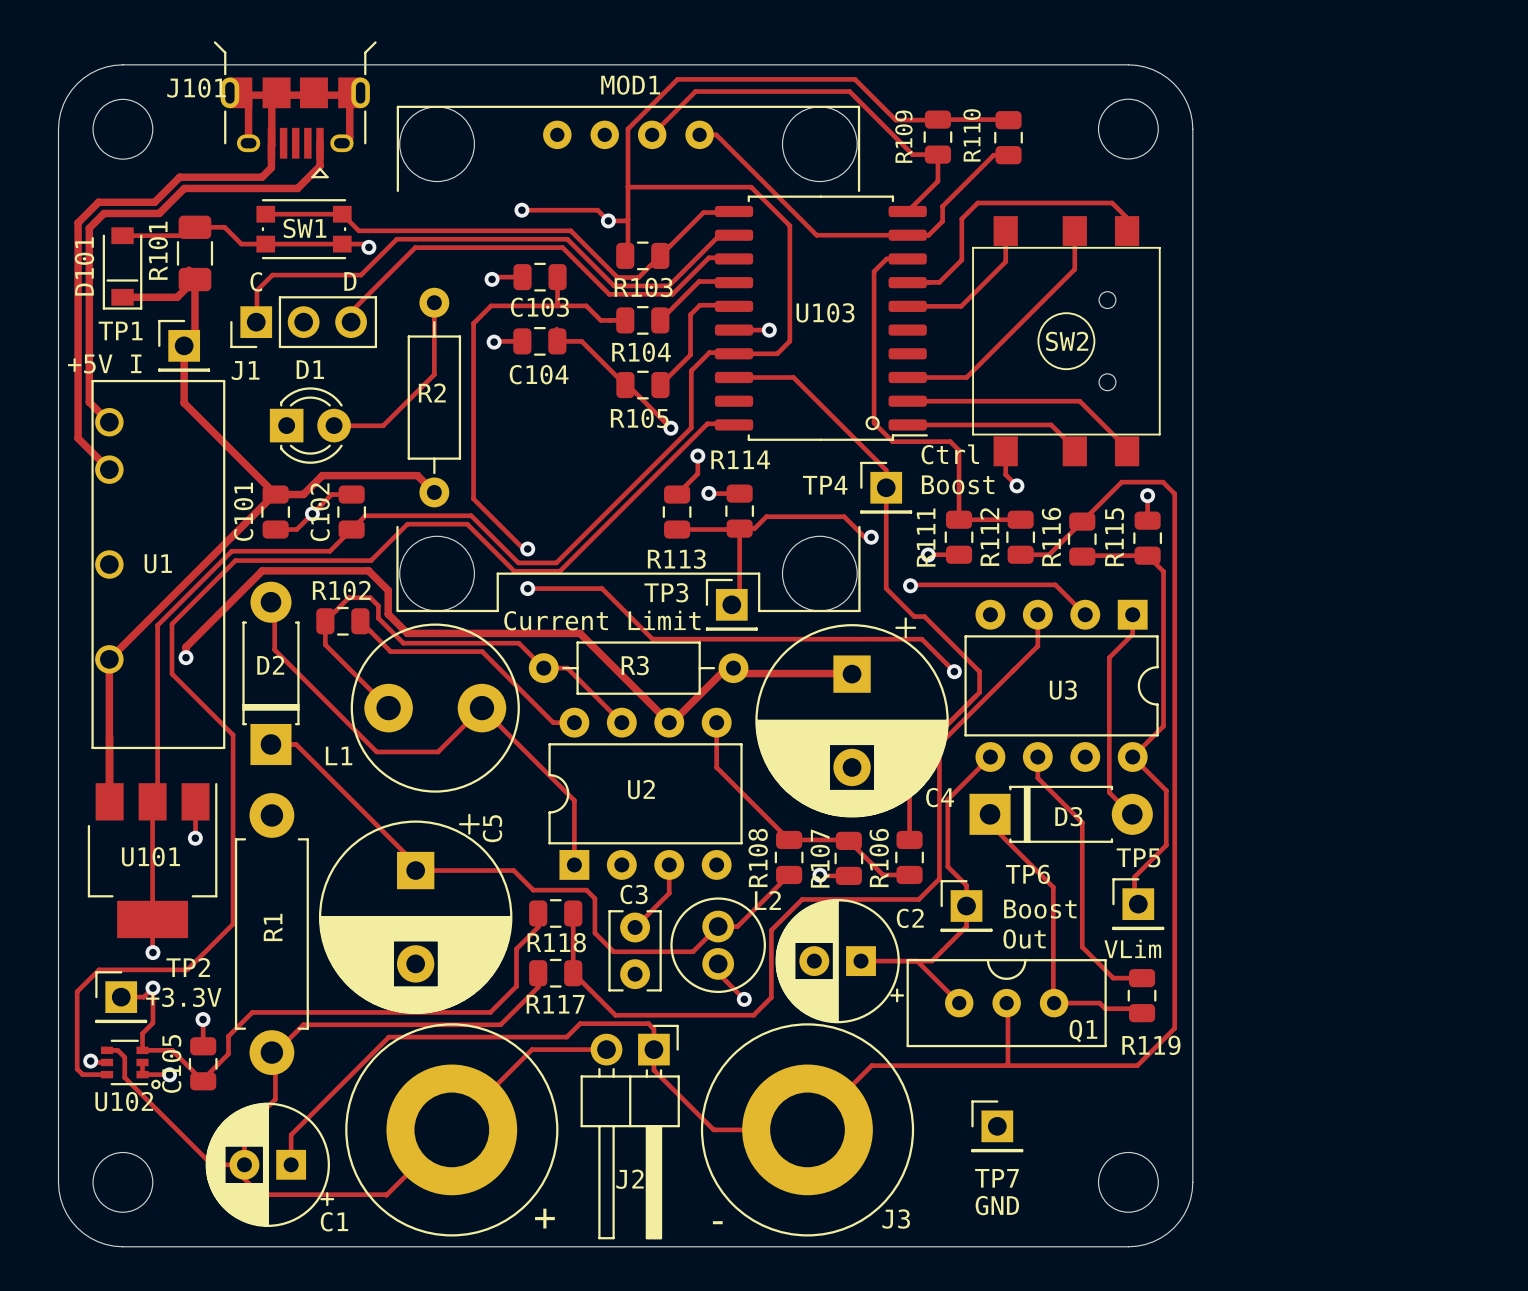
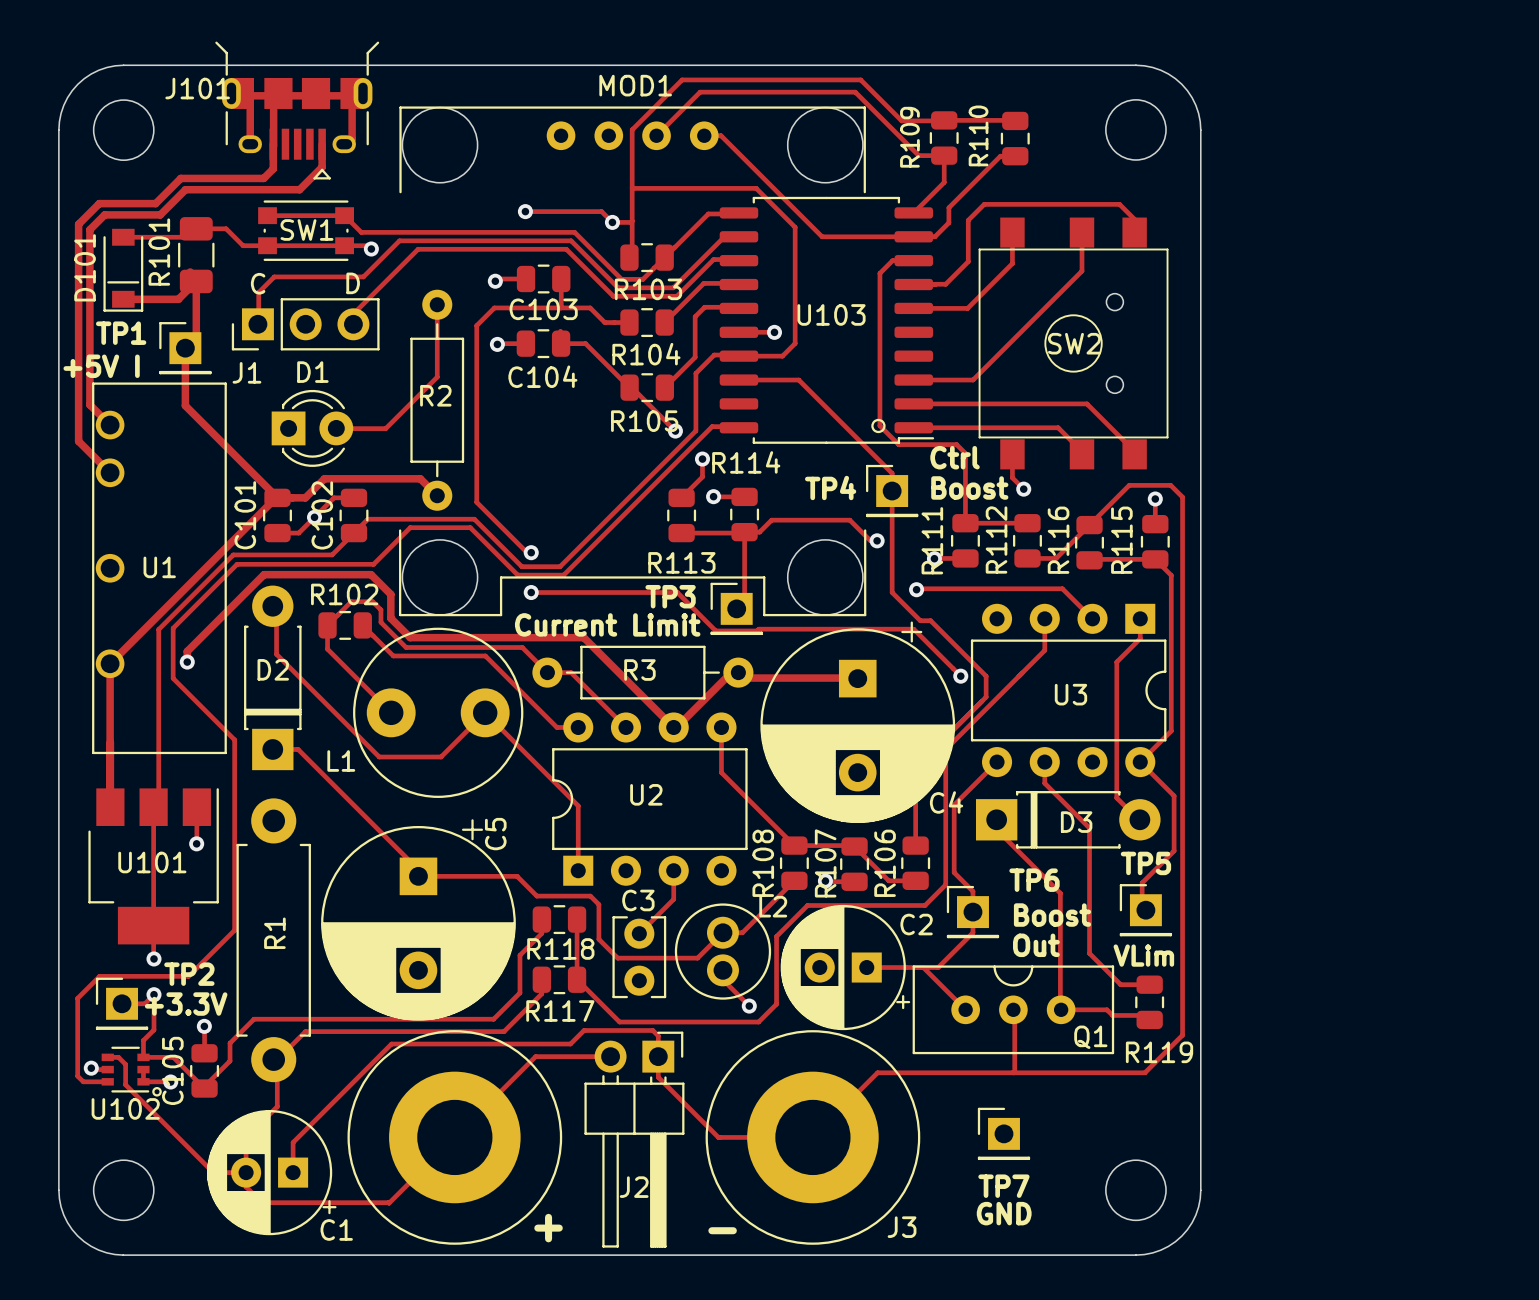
track: (602, 588) (652, 639) (921, 639) -> (606, 592) (677, 592) (715, 630) (913, 629) (928, 643)

